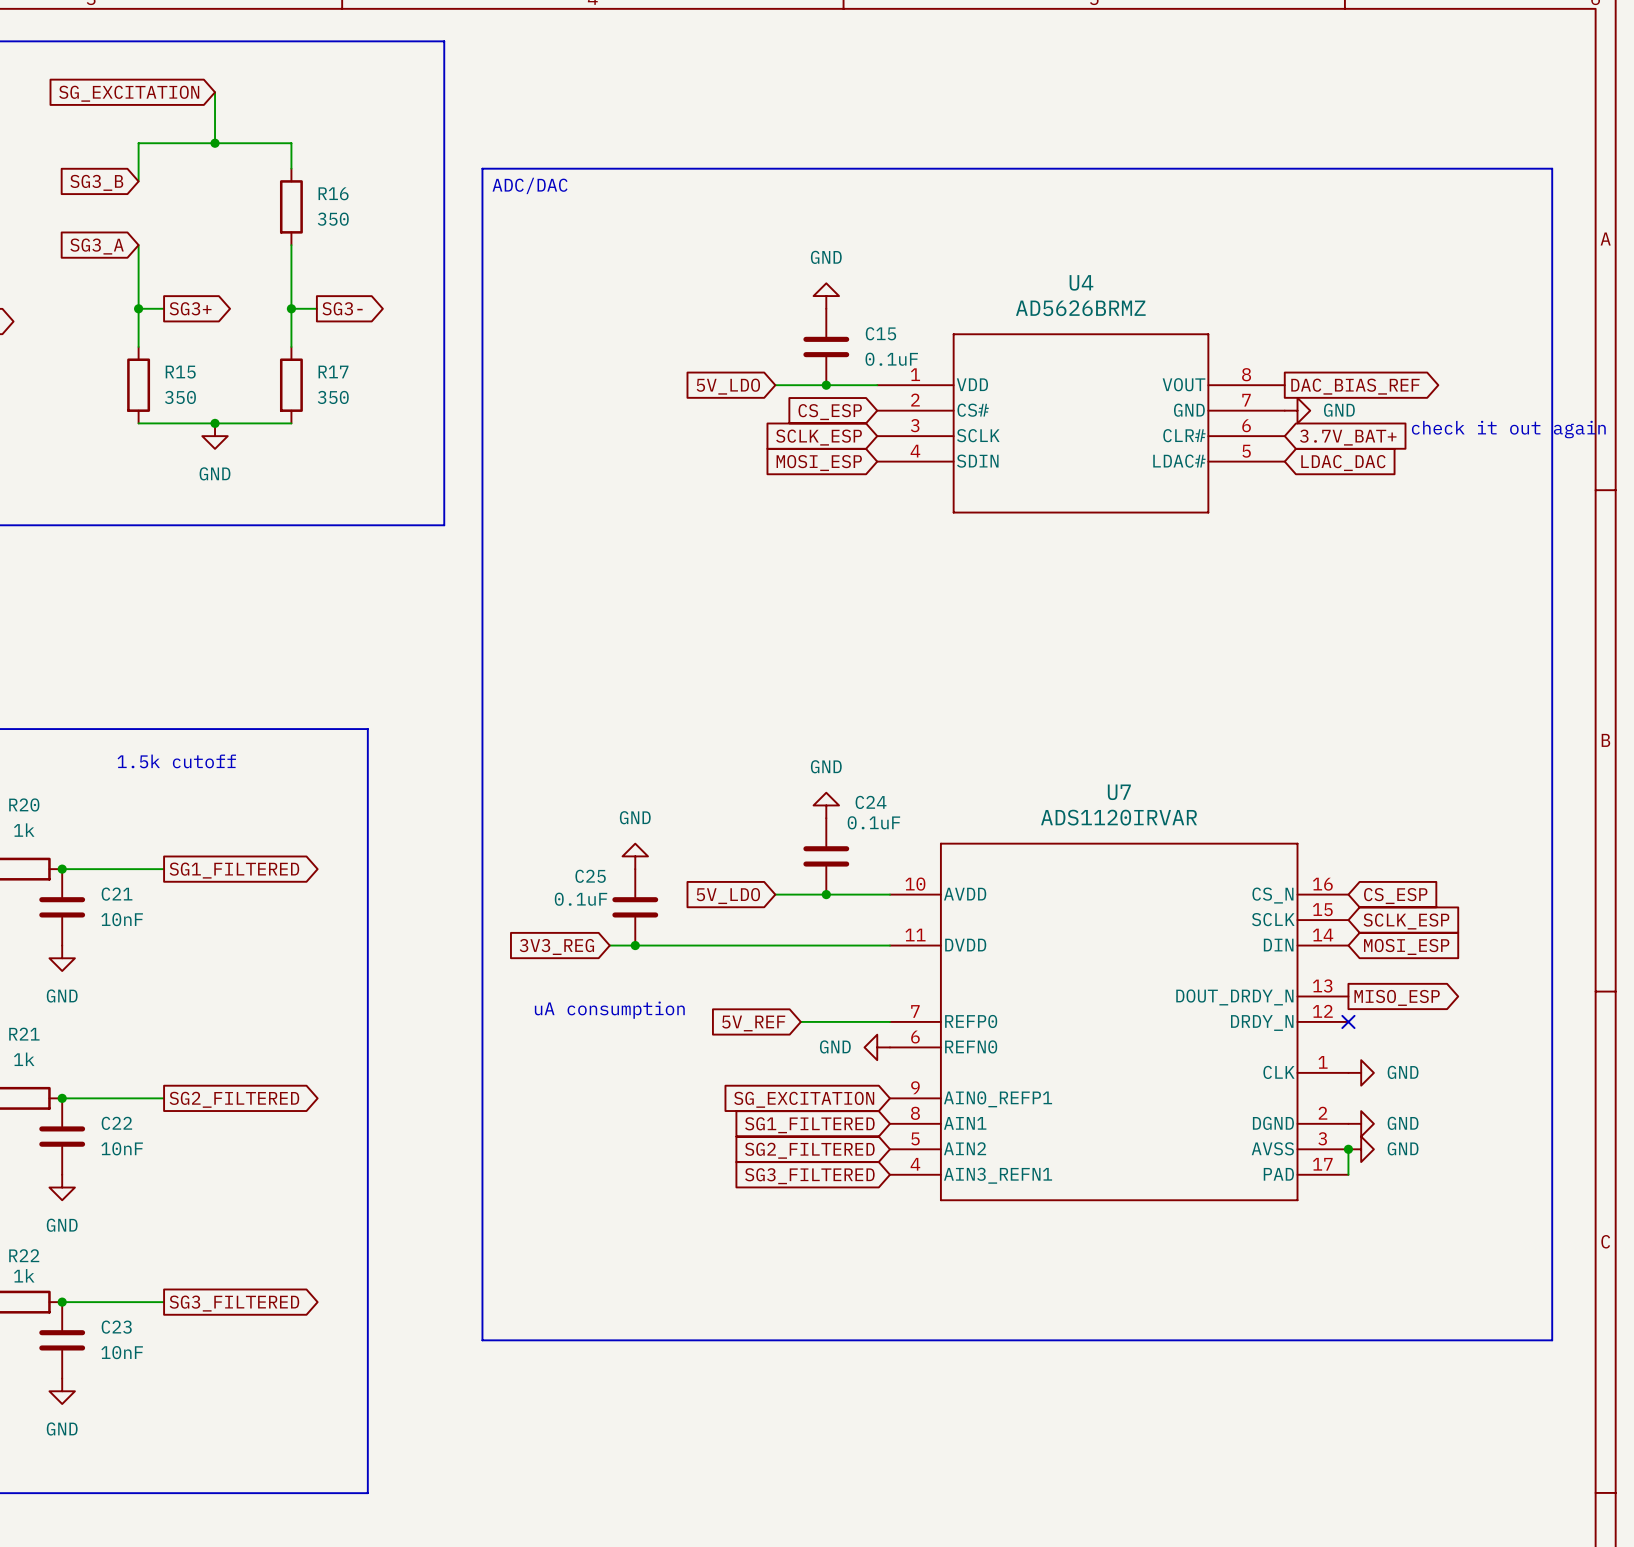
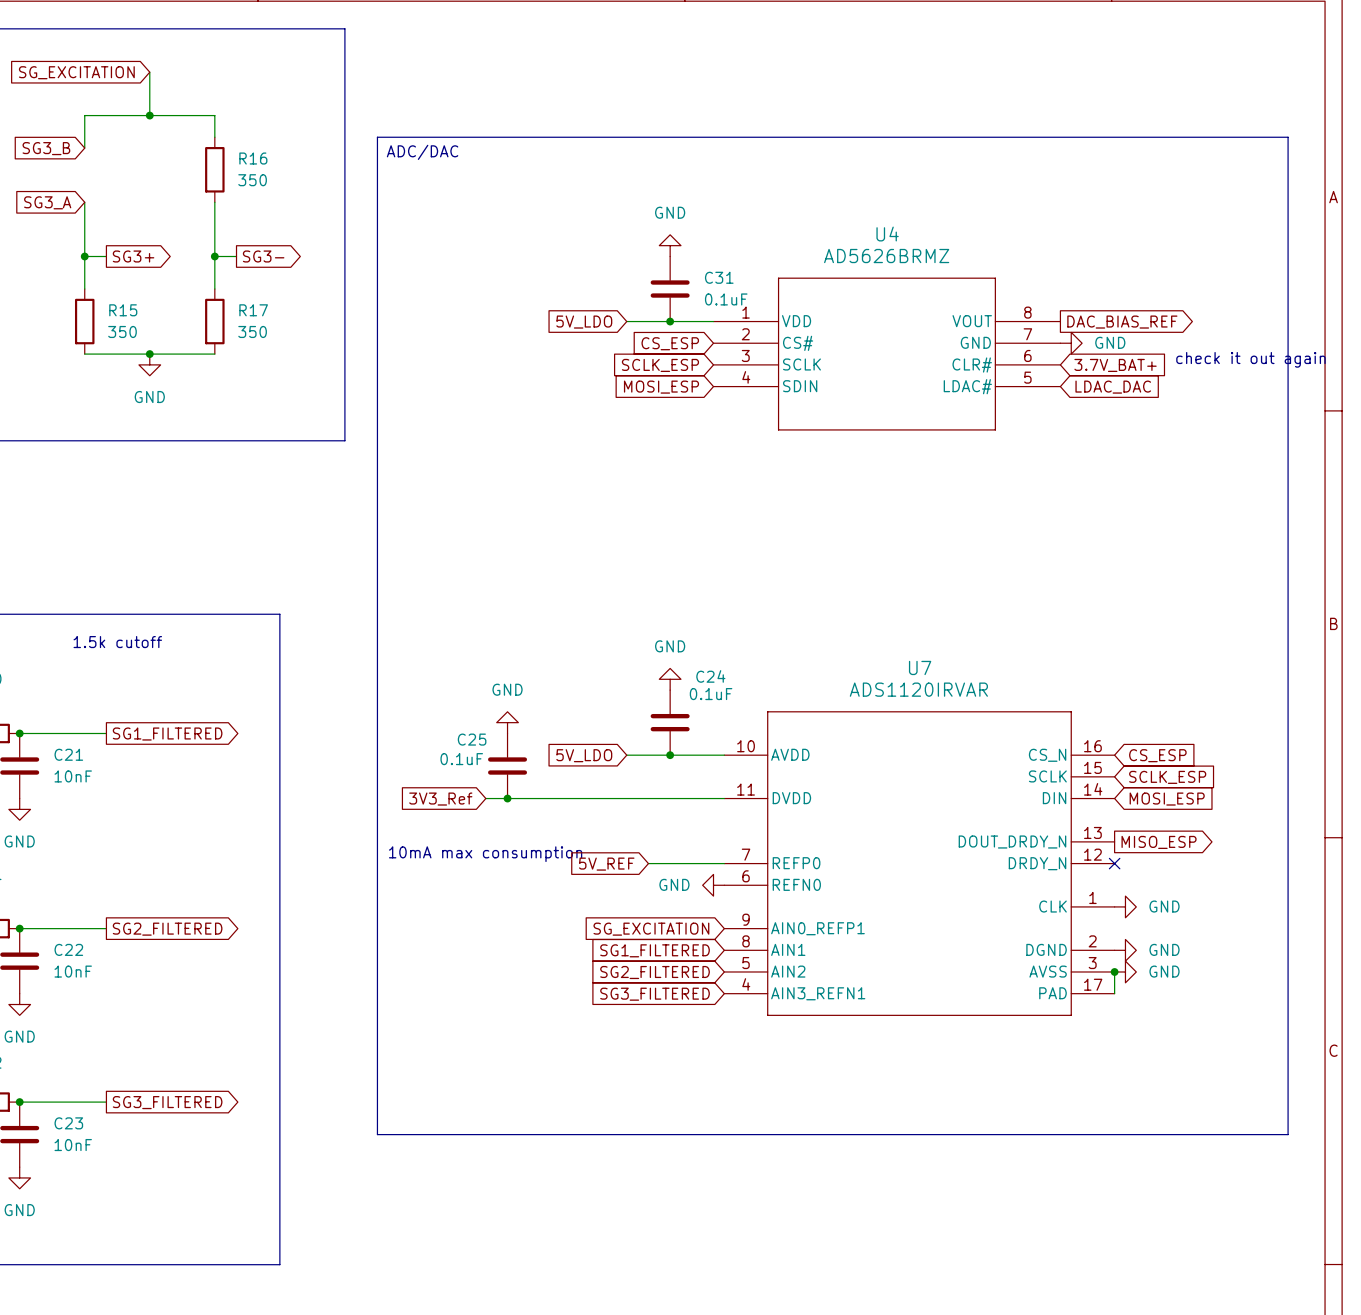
C15 name: C15 (880, 333) -> C31 (719, 277)
global label: 3V3_REG (556, 946) -> 3V3_Ref (440, 799)
text: uA consumption (609, 1010) -> 10mA max consumption (485, 854)

